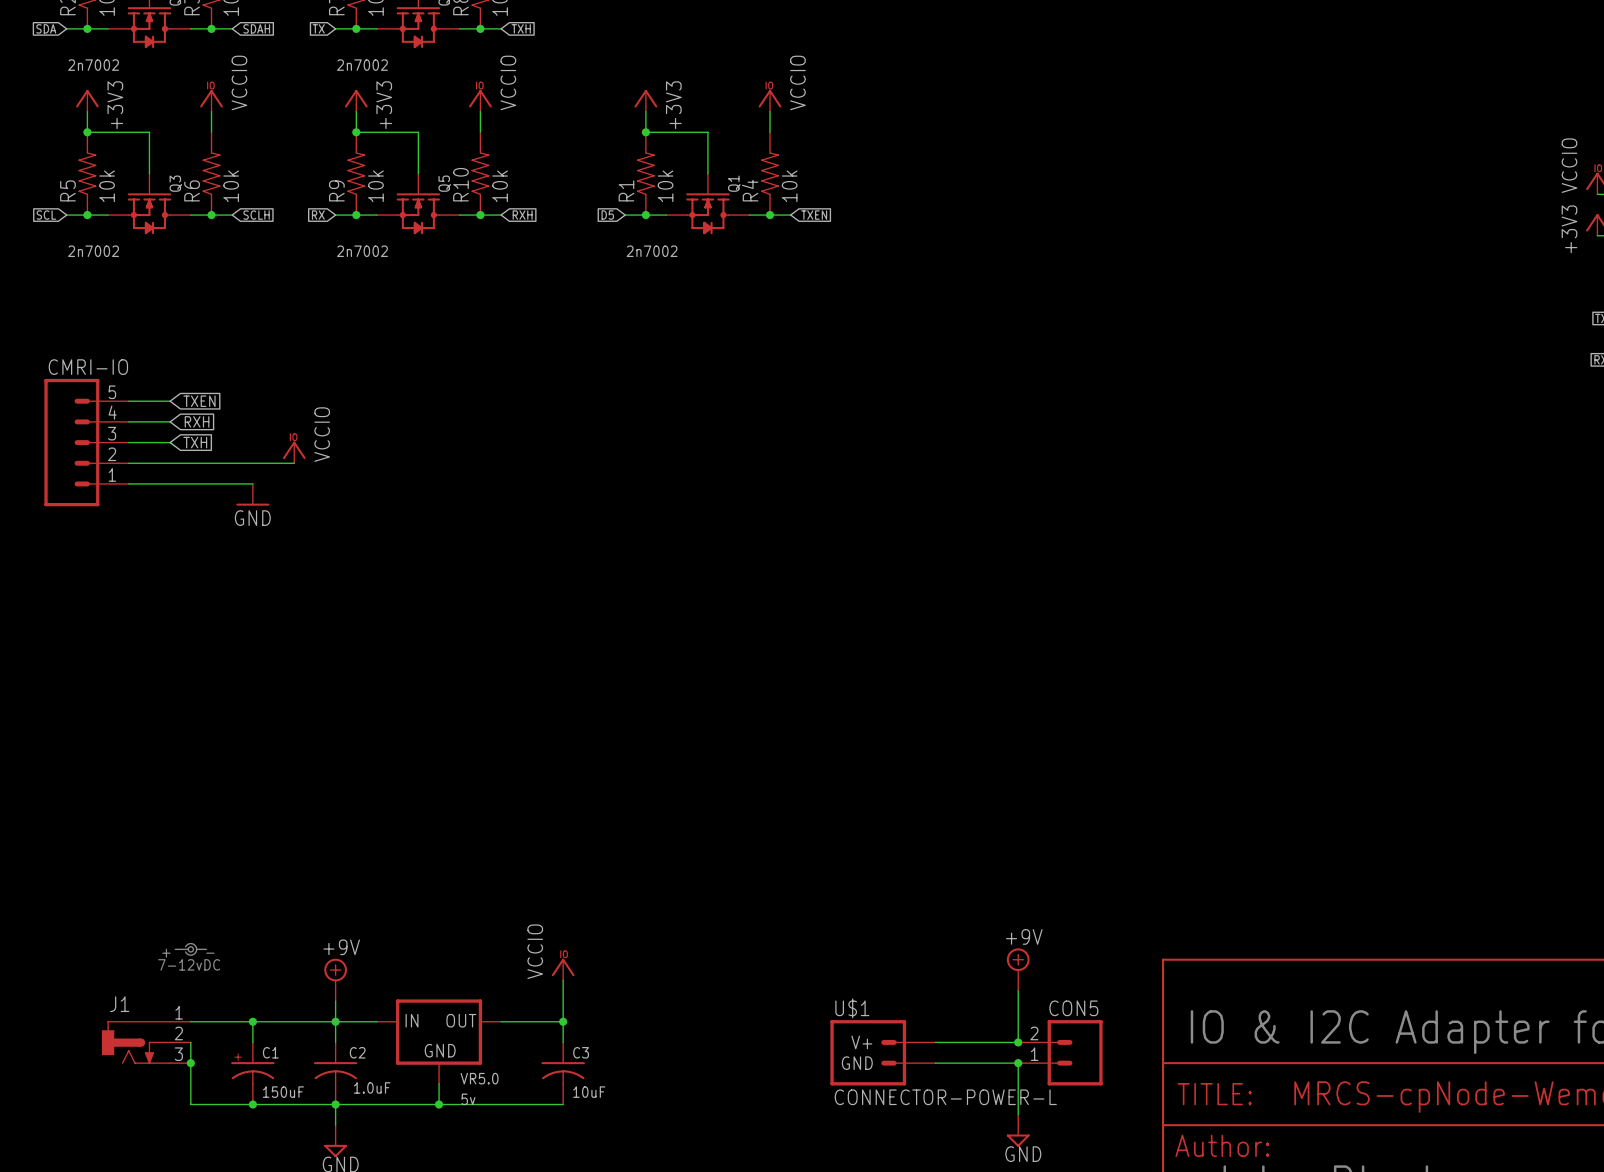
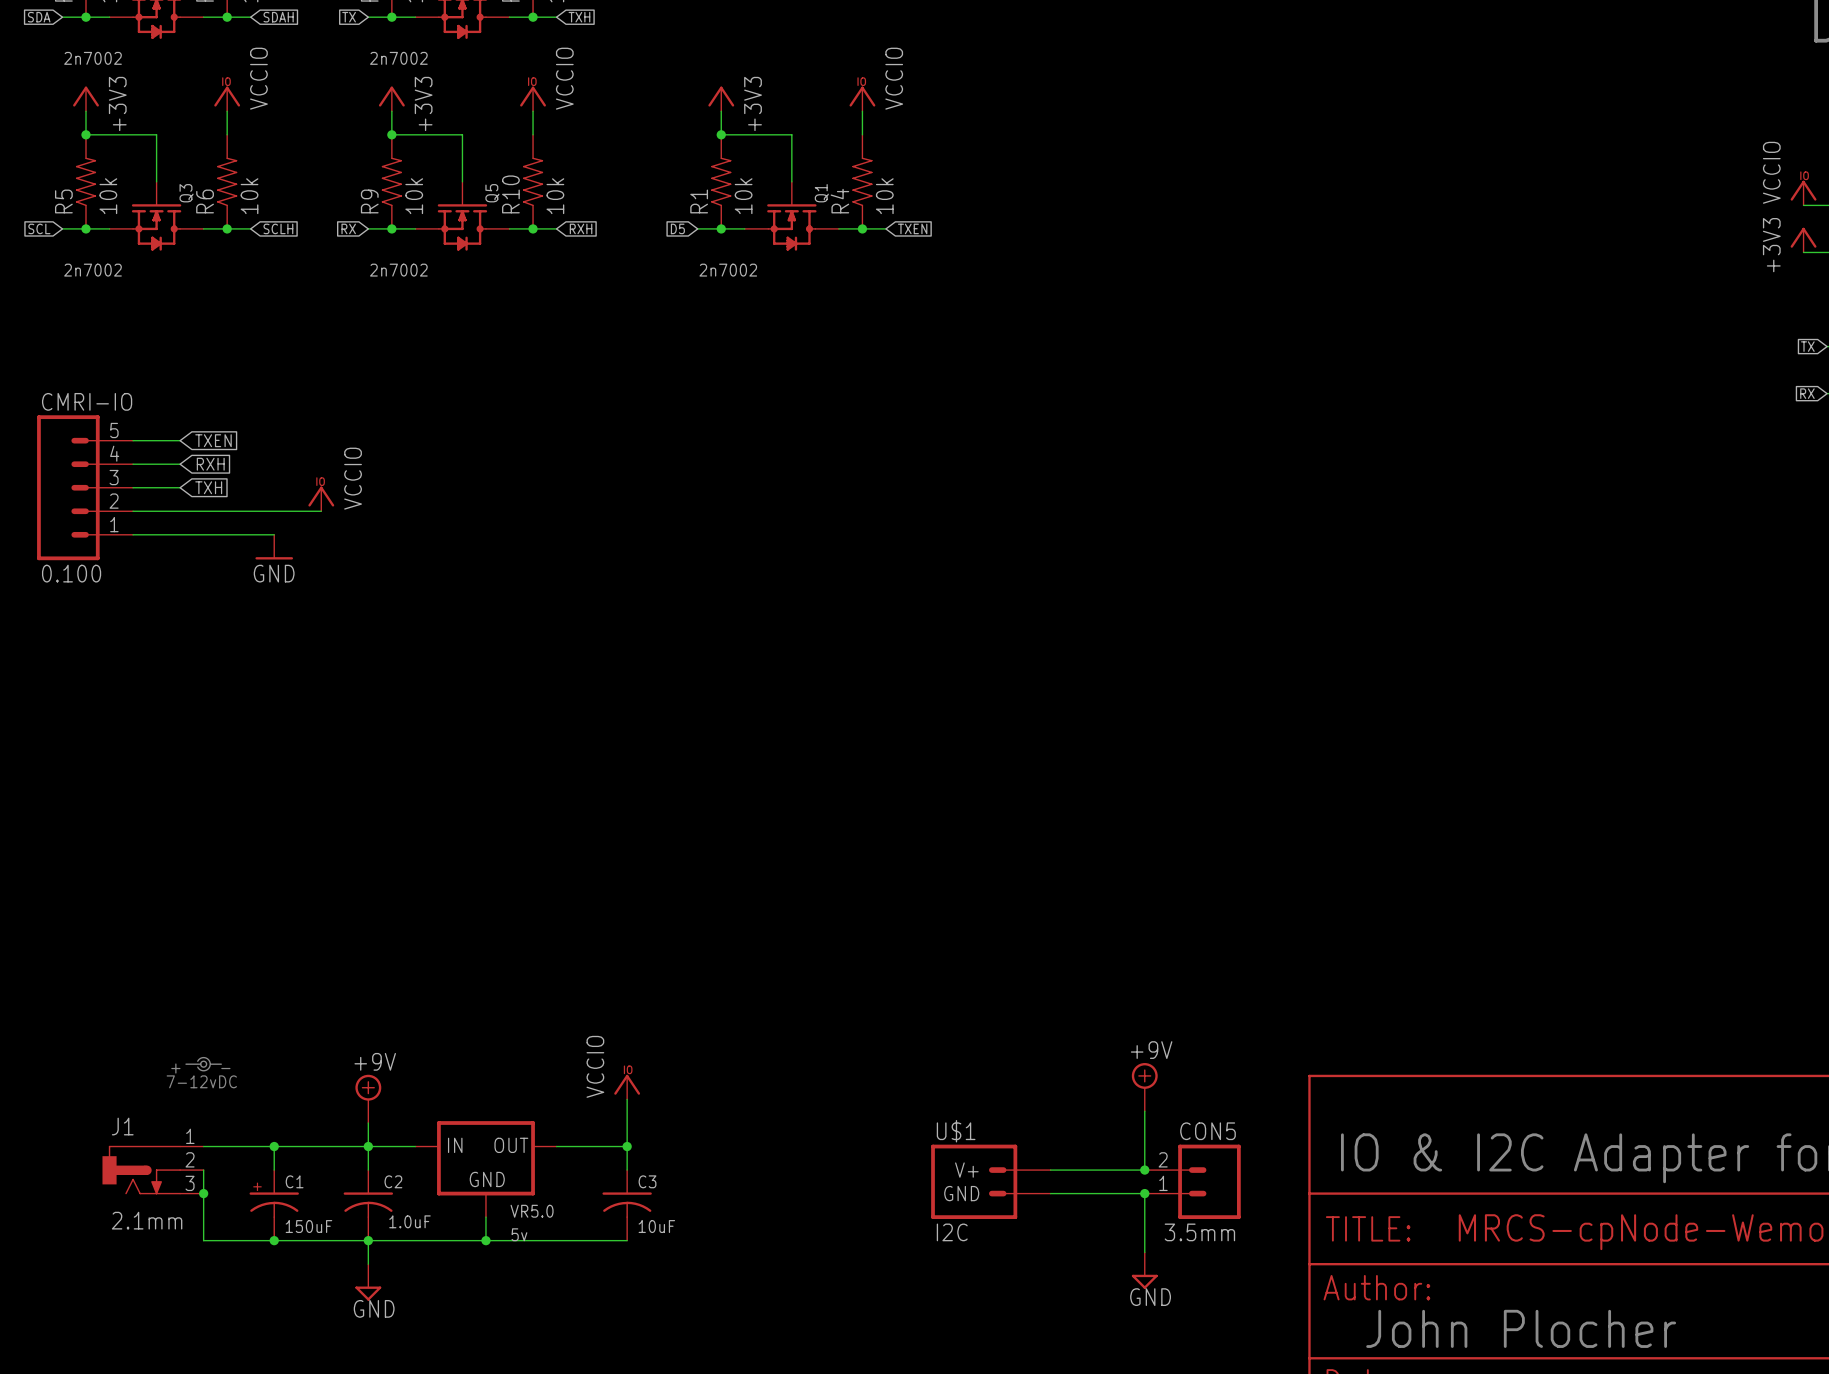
CMRI-IO value: none -> 0.100 (71, 573)
J1 value: none -> 2.1mm (147, 1220)
U$1 value: CONNECTOR-POWER-L (945, 1097) -> I2C (952, 1232)
CON5 value: none -> 3.5mm (1199, 1232)

